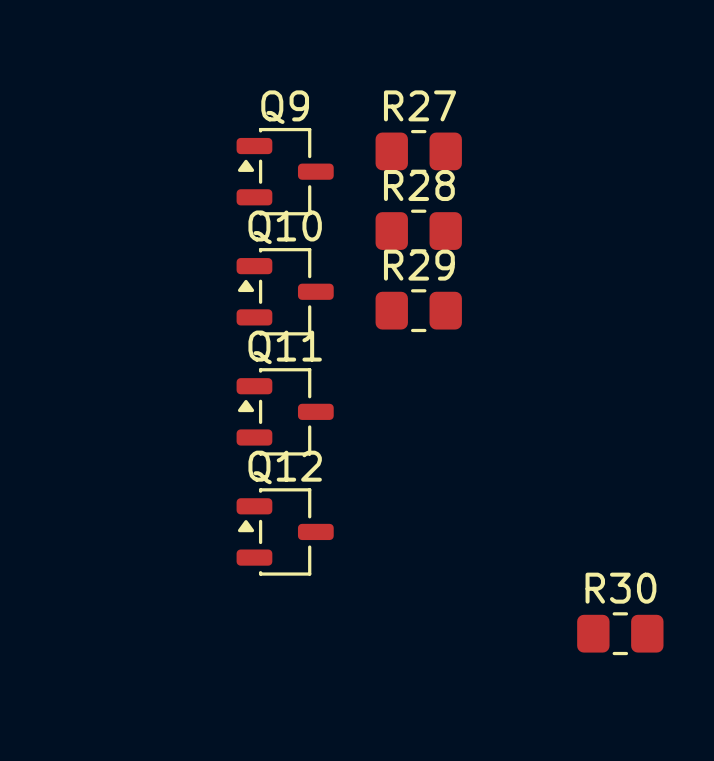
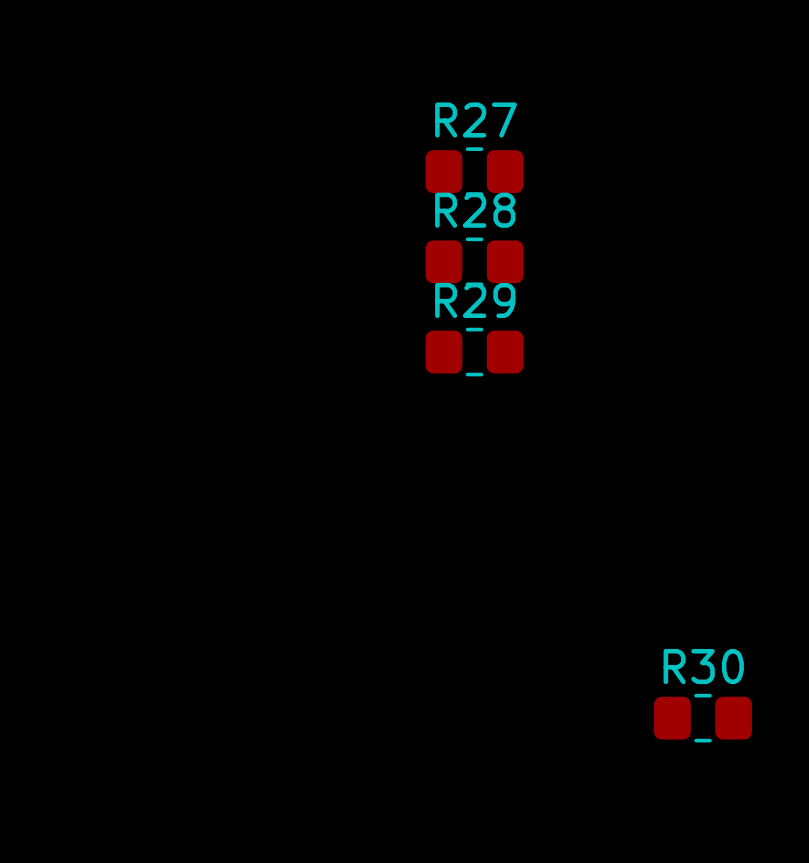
Q9: (285, 171) -> none
Q10: (285, 291) -> none
Q11: (285, 411) -> none
Q12: (285, 531) -> none

